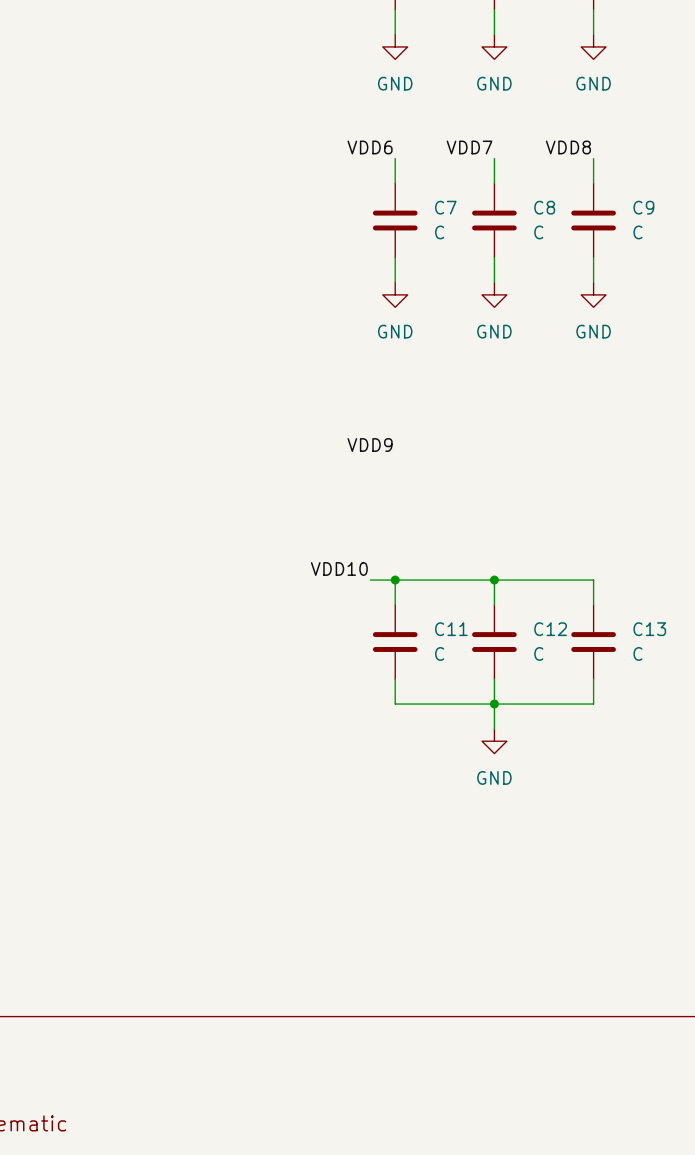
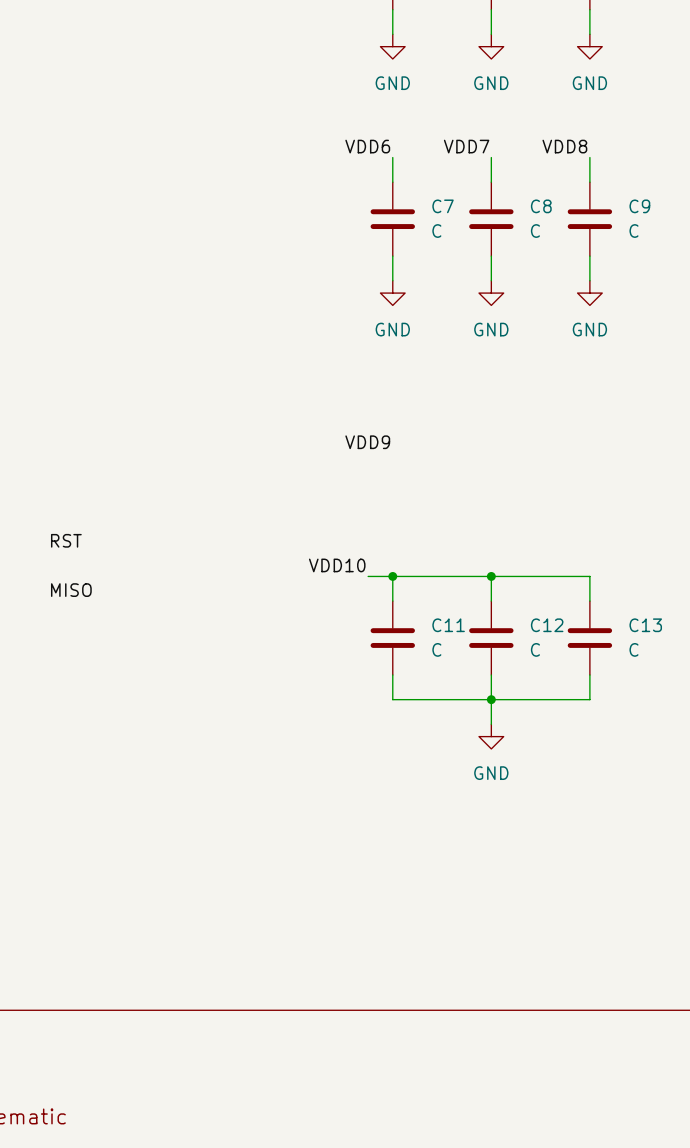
label: none -> RST (66, 540)
label: none -> MISO (71, 590)

